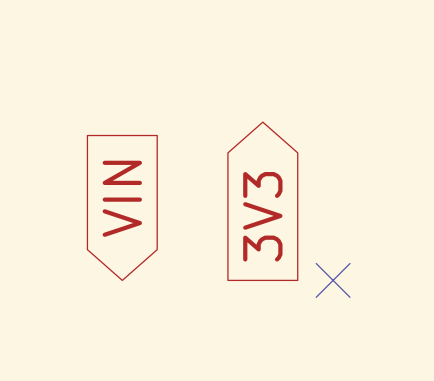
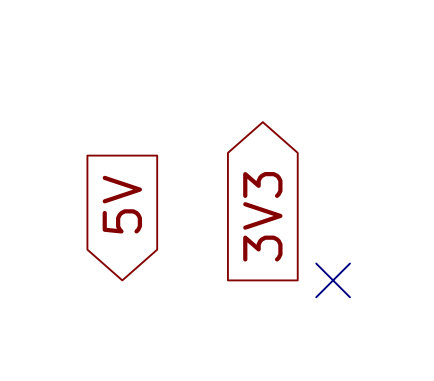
global label: VIN (122, 198) -> 5V (122, 204)

